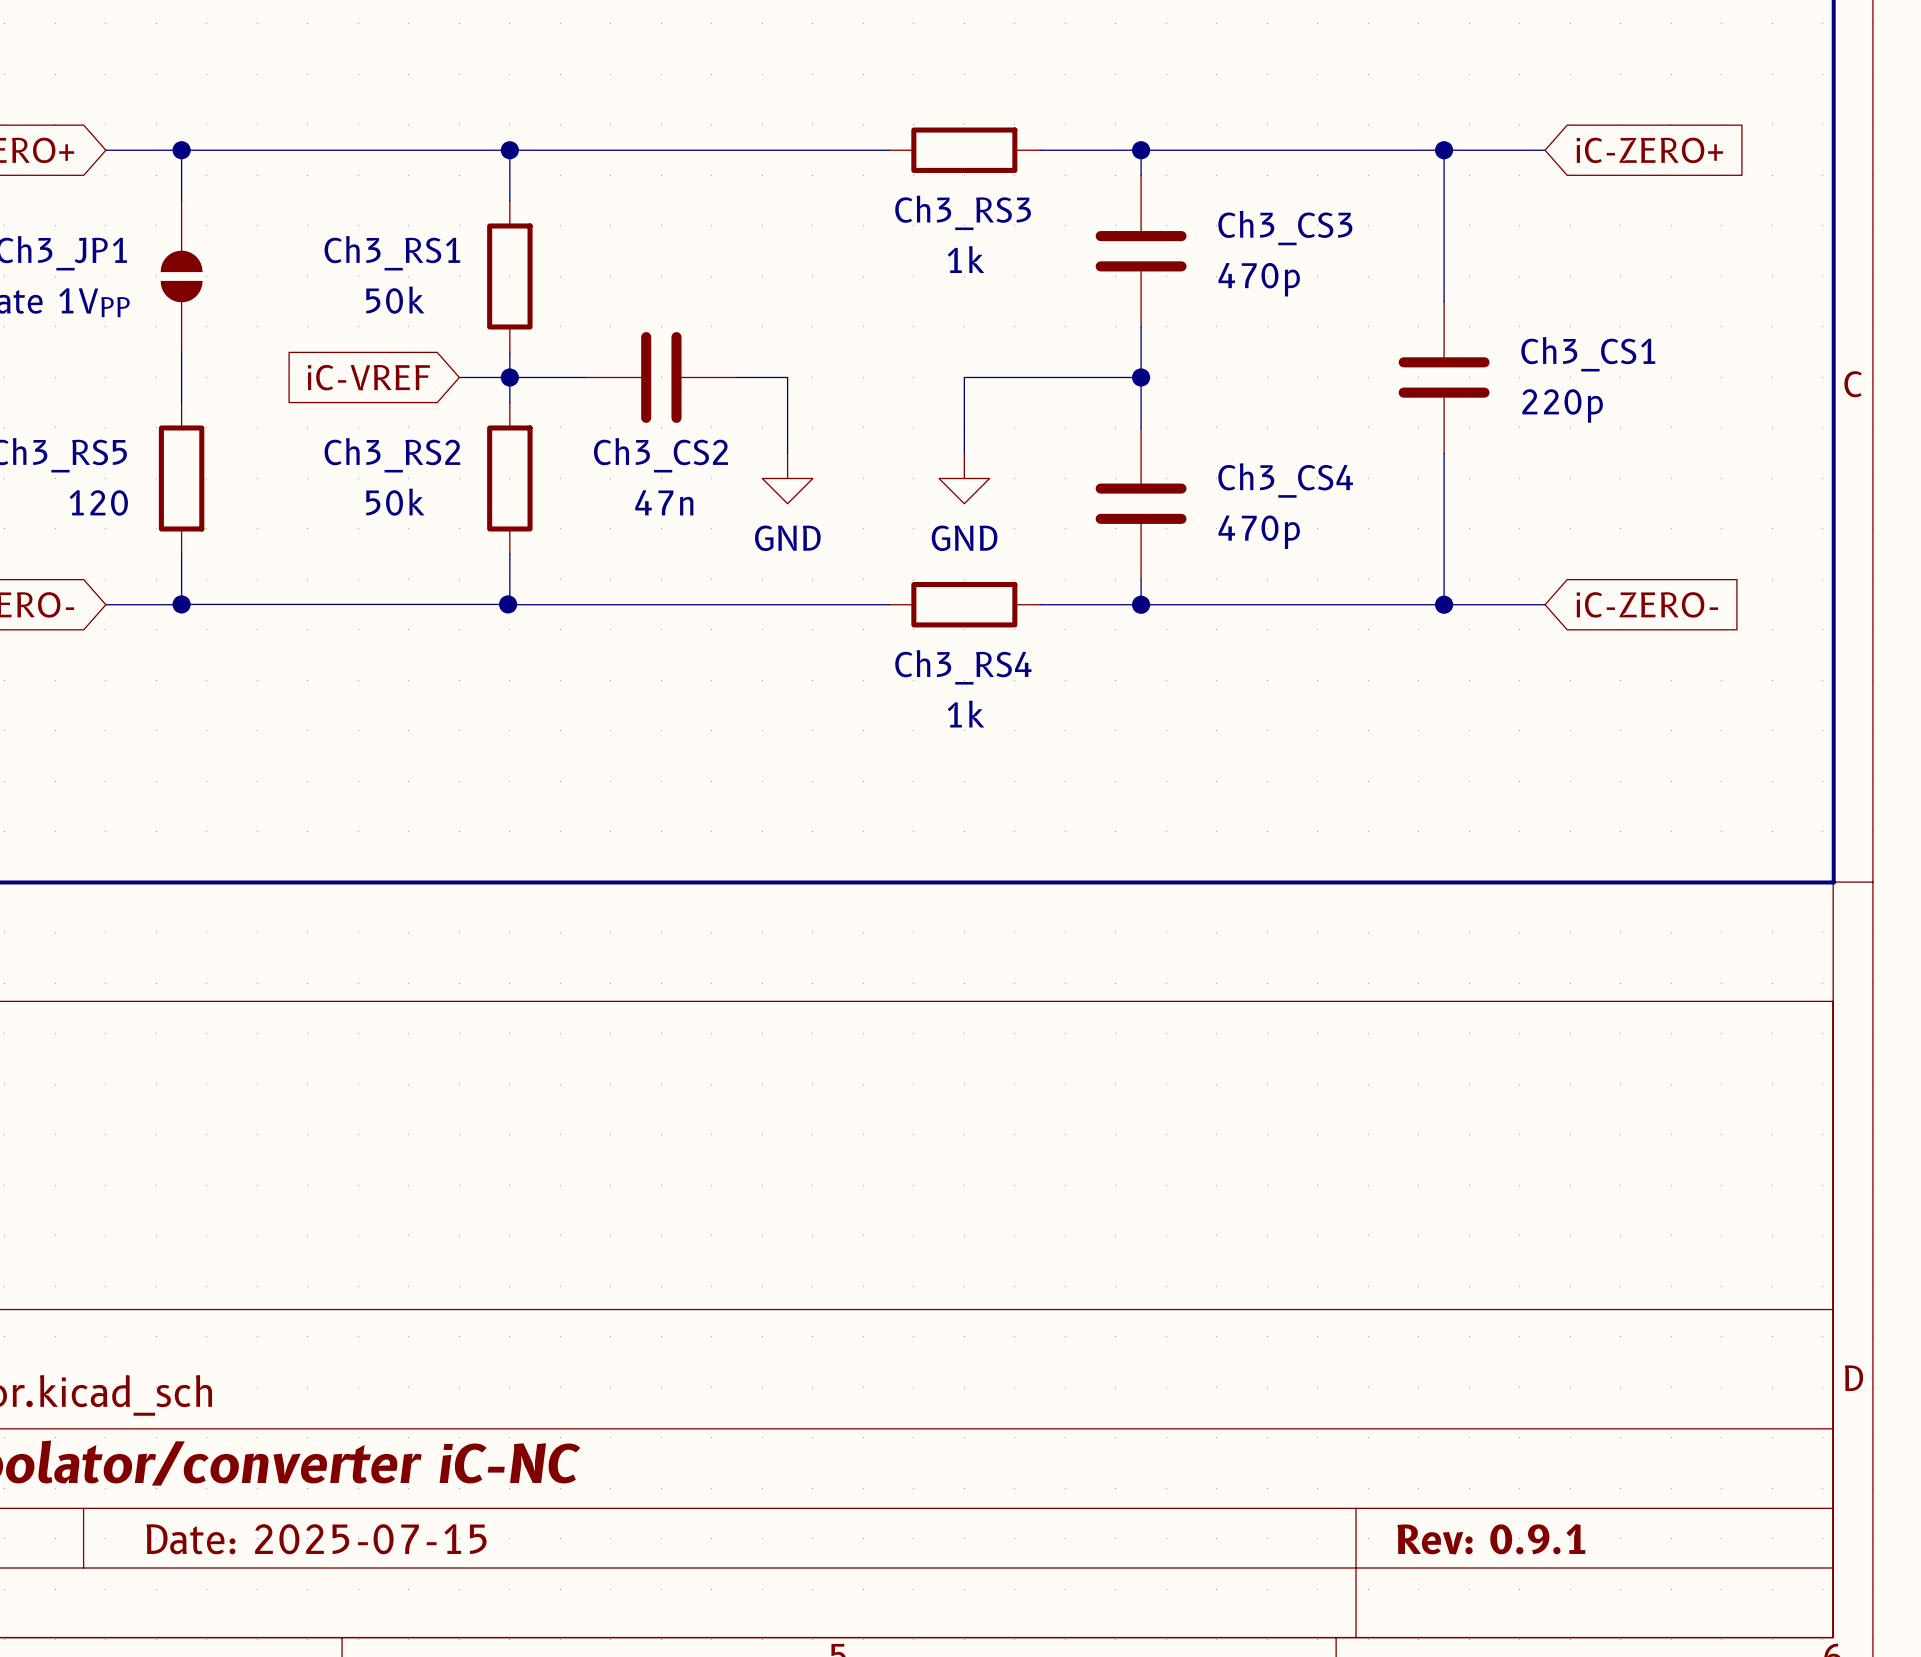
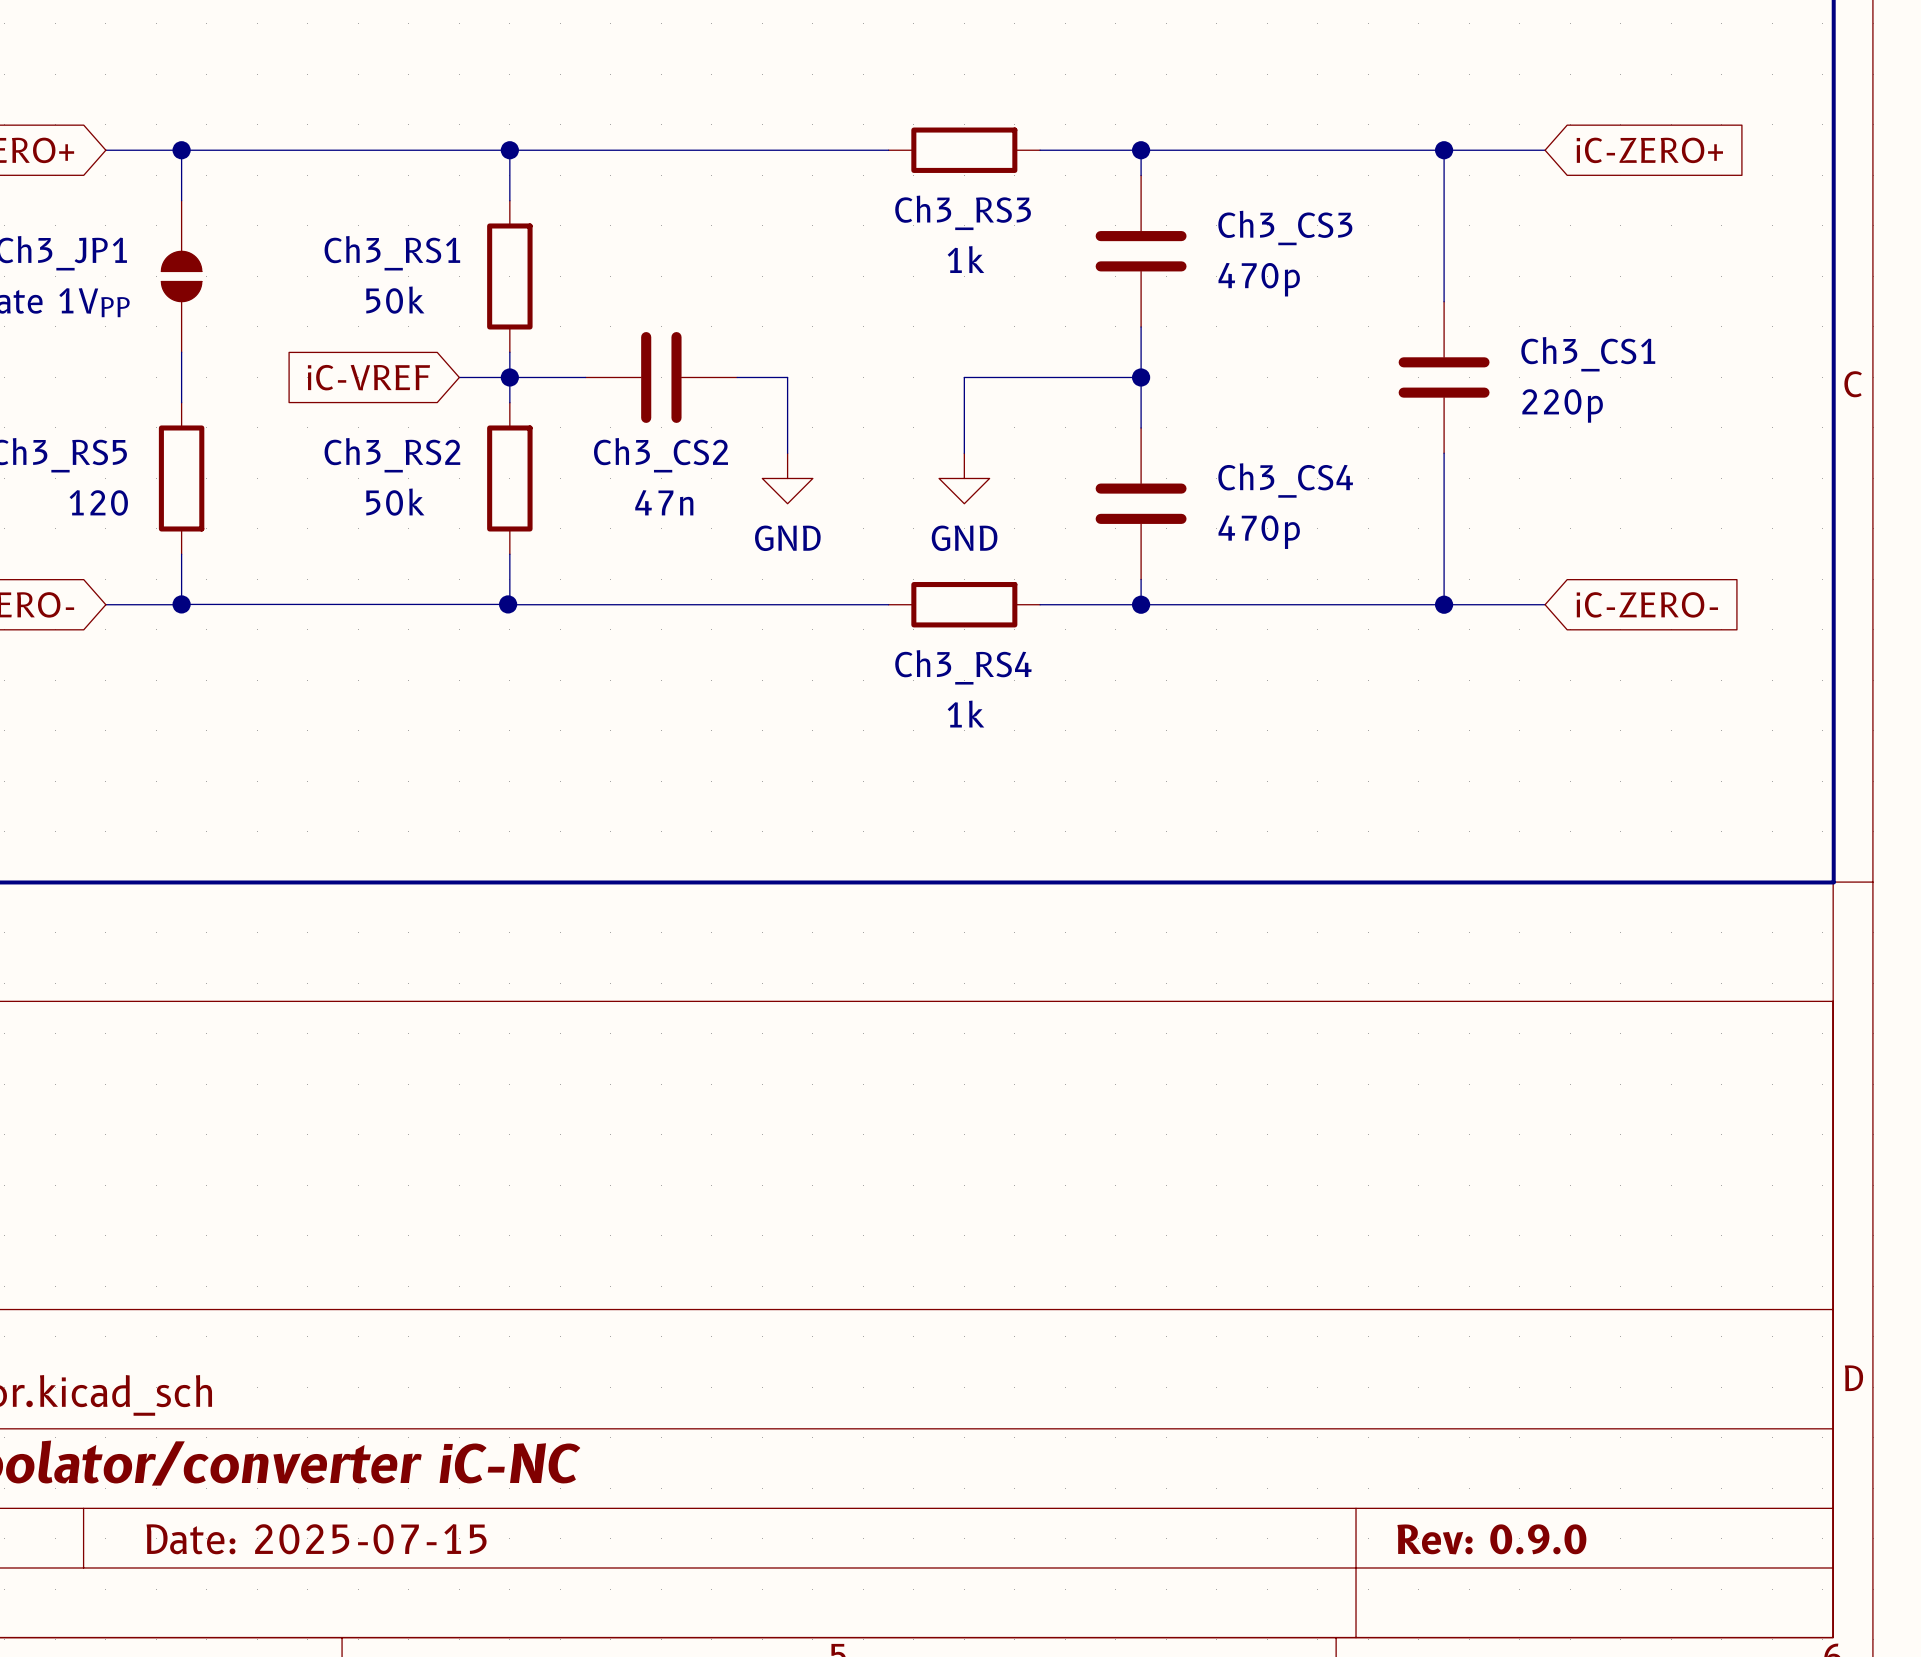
title block: Rev: 0.9.1 (1491, 1539) -> Rev: 0.9.0 (1491, 1539)

